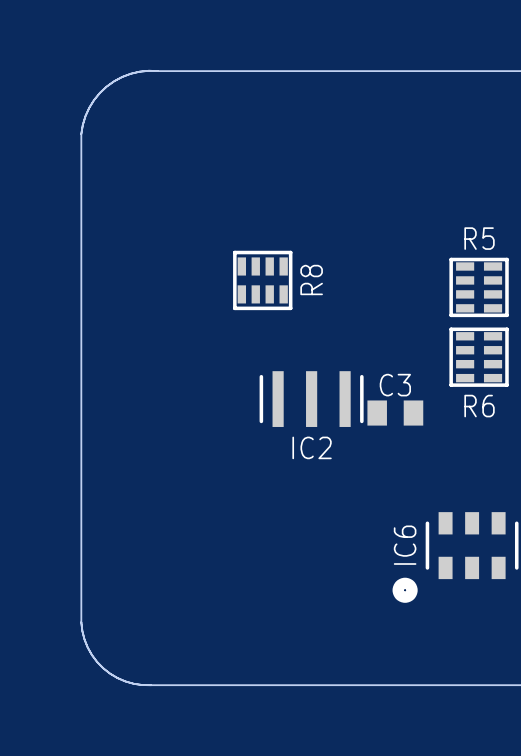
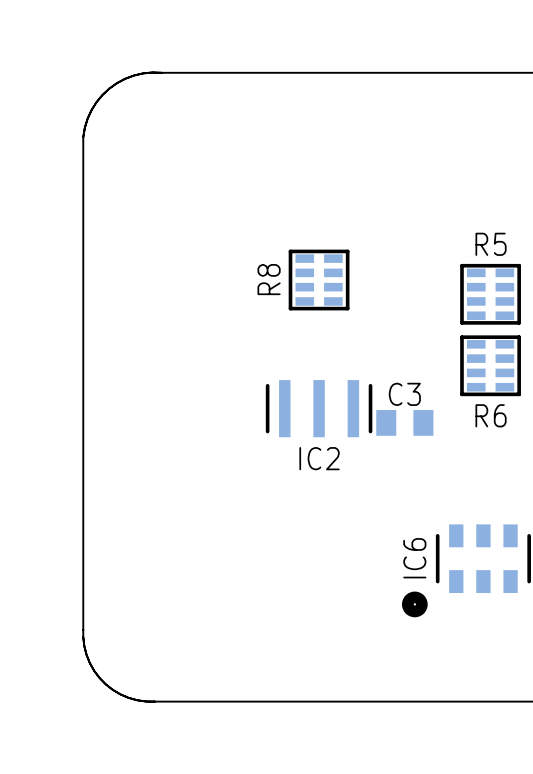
R8 name position: R8 (311, 279) -> R8 (269, 279)
R8 rotation: 0° (262, 280) -> 90° clockwise (319, 280)
R8 position: (262, 280) -> (319, 280)

